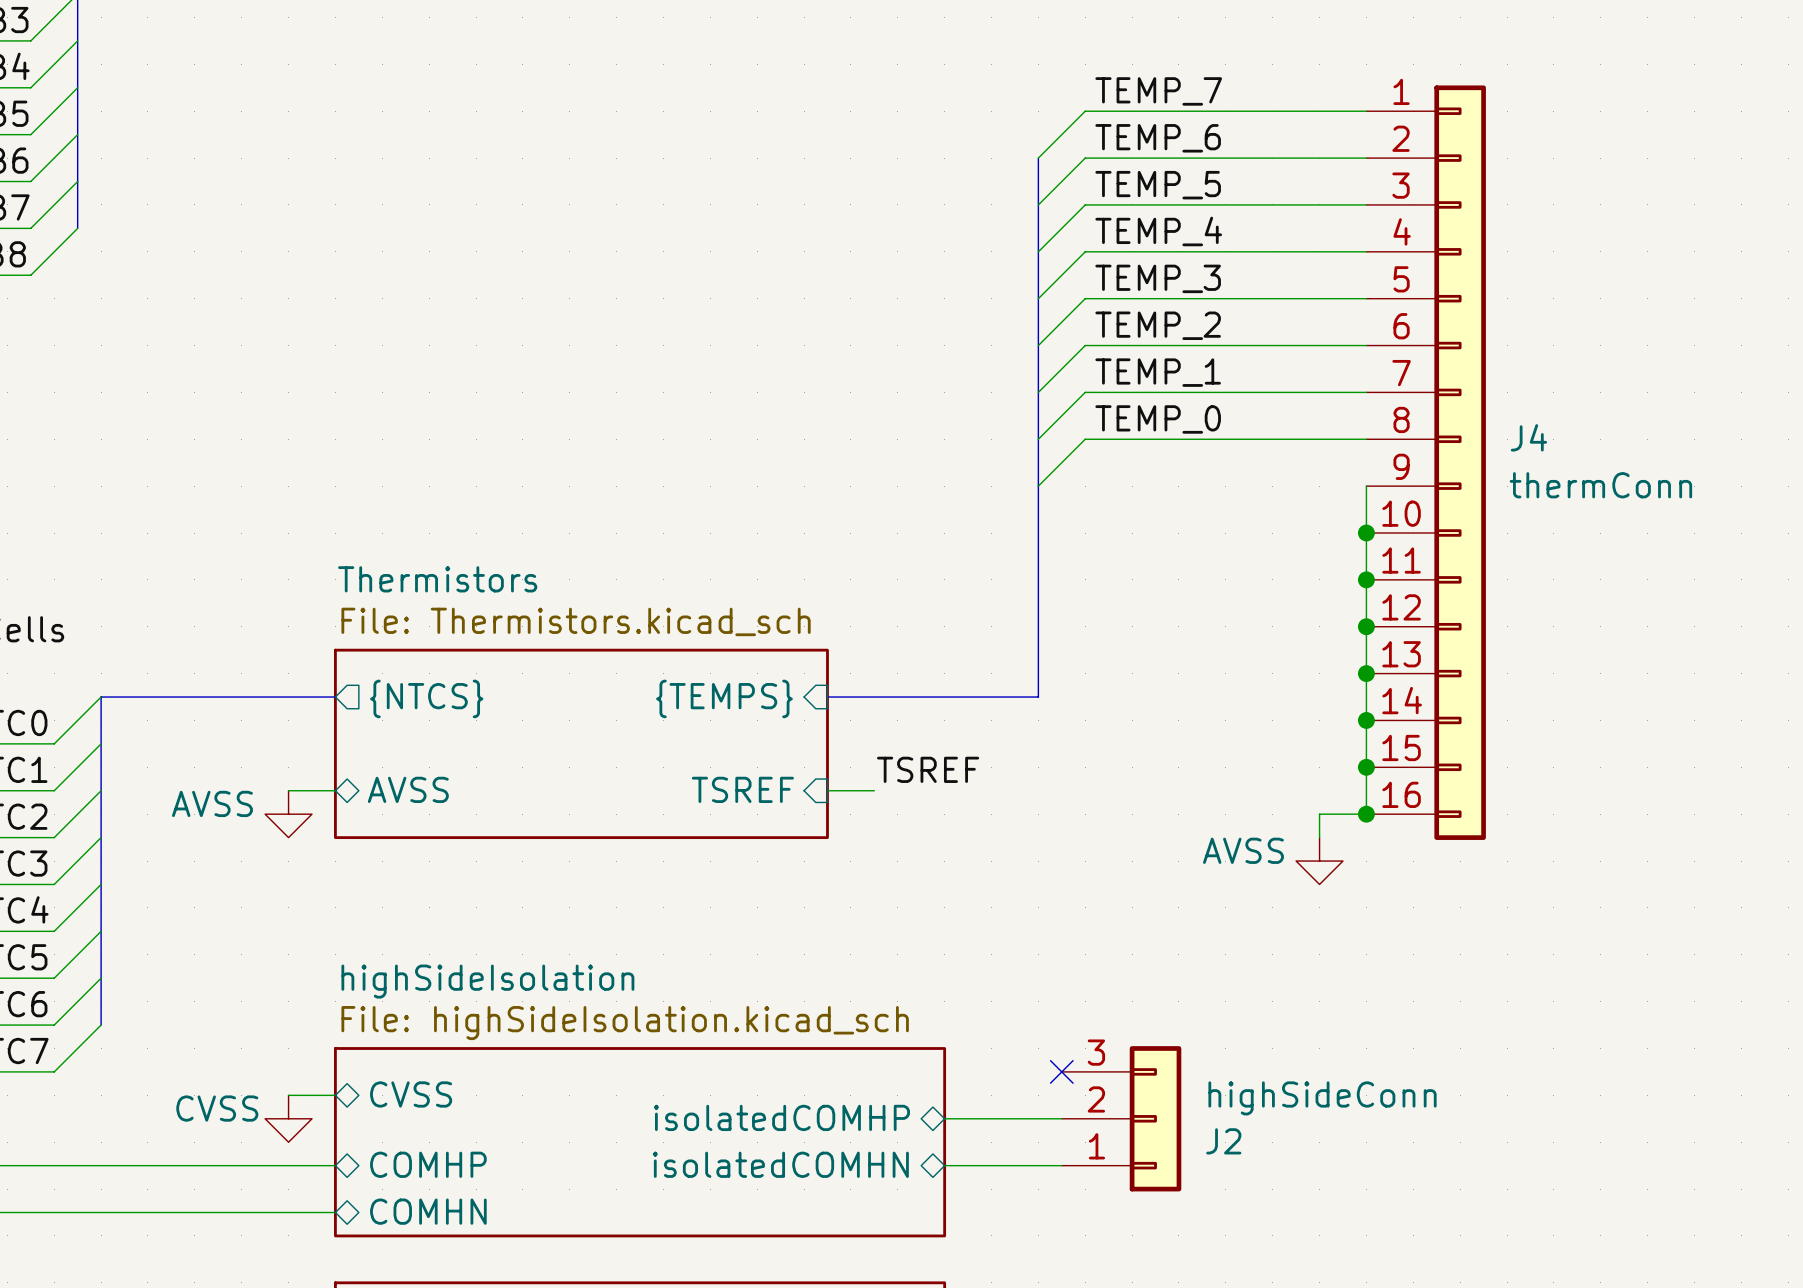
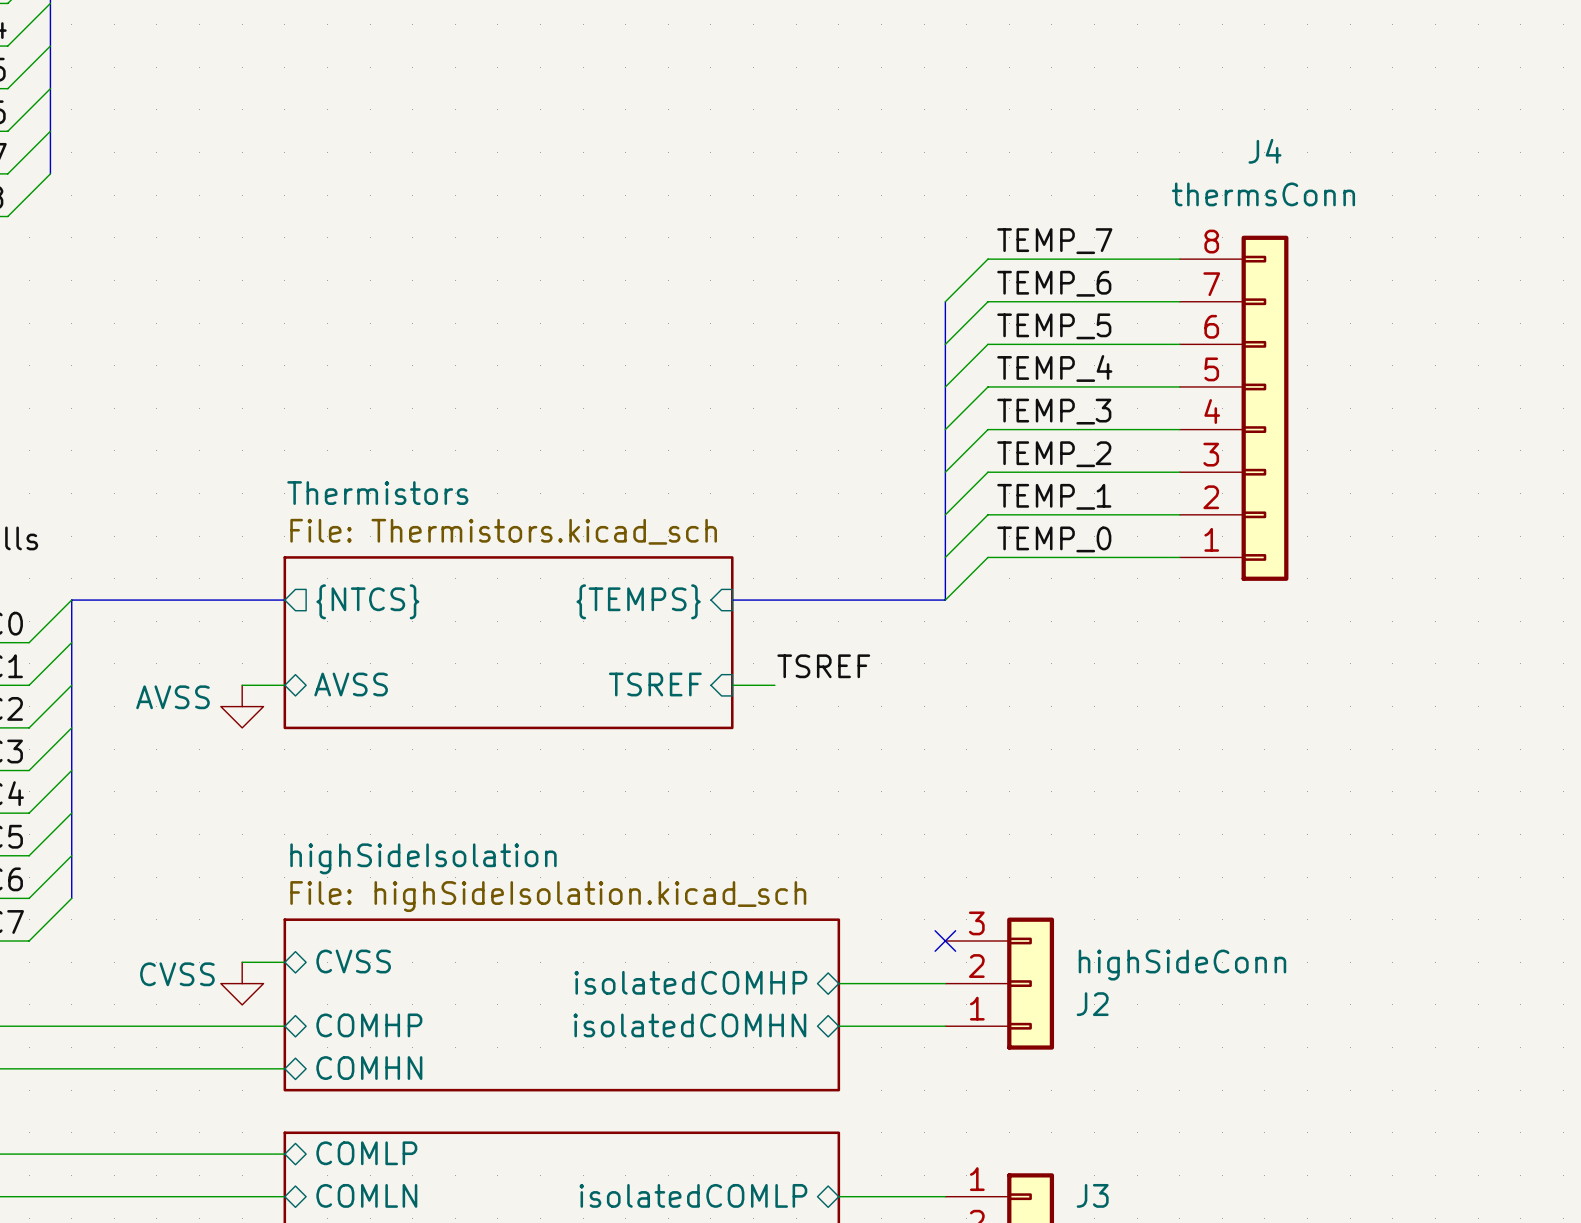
J4 symbol: [1366, 85, 1486, 840] -> [1179, 235, 1289, 581]
label position: TEMP_7 (1158, 91) -> TEMP_7 (1054, 241)
wire: (1366, 111) (1085, 111) (1038, 158) -> none
label position: TEMP_6 (1158, 138) -> TEMP_6 (1054, 283)
bus: (1038, 158) (1038, 697) -> (945, 301) (945, 600) (924, 600)
wire: (1366, 158) (1085, 158) (1038, 204) -> none
label position: TEMP_5 (1158, 185) -> TEMP_5 (1054, 326)
wire: (1366, 204) (1085, 204) (1038, 251) -> none
label position: TEMP_4 (1158, 231) -> TEMP_4 (1054, 368)
wire: (1366, 251) (1085, 251) (1038, 298) -> none
label position: TEMP_3 (1158, 278) -> TEMP_3 (1054, 411)
wire: (1366, 298) (1085, 298) (1038, 345) -> none
label position: TEMP_2 (1158, 325) -> TEMP_2 (1054, 454)
wire: (1085, 345) (1366, 345) -> (966, 280) (987, 259) (1179, 259)
wire: (1061, 368) (1038, 392) -> none
label position: TEMP_1 (1158, 372) -> TEMP_1 (1054, 496)
wire: (1085, 392) (1366, 392) -> (966, 323) (987, 301) (1179, 301)
wire: (1061, 415) (1038, 439) -> none
label position: TEMP_0 (1158, 419) -> TEMP_0 (1054, 539)
J4 name position: J4 (1528, 437) -> J4 (1264, 151)
wire: (1085, 439) (1366, 439) -> (966, 365) (987, 344) (1179, 344)
wire: (1061, 462) (1038, 486) -> none
wire: none -> (1179, 386) (987, 386) (945, 429)
J4 value: thermConn (1600, 485) -> thermsConn (1263, 194)
wire: (1366, 486) (1366, 814) (1319, 814) (1319, 837) -> none
wire: none -> (1179, 429) (987, 429) (945, 472)
junction: (1366, 533) -> none
wire: none -> (1179, 472) (987, 472) (945, 514)
junction: (1366, 579) -> none
wire: none -> (1179, 514) (987, 514) (945, 557)
junction: (1366, 626) -> none
wire: none -> (1179, 557) (987, 557) (945, 600)
junction: (1366, 673) -> none
junction: (1366, 720) -> none
junction: (1366, 767) -> none
junction: (1366, 814) -> none
power symbol: AVSS (1319, 861) -> none

